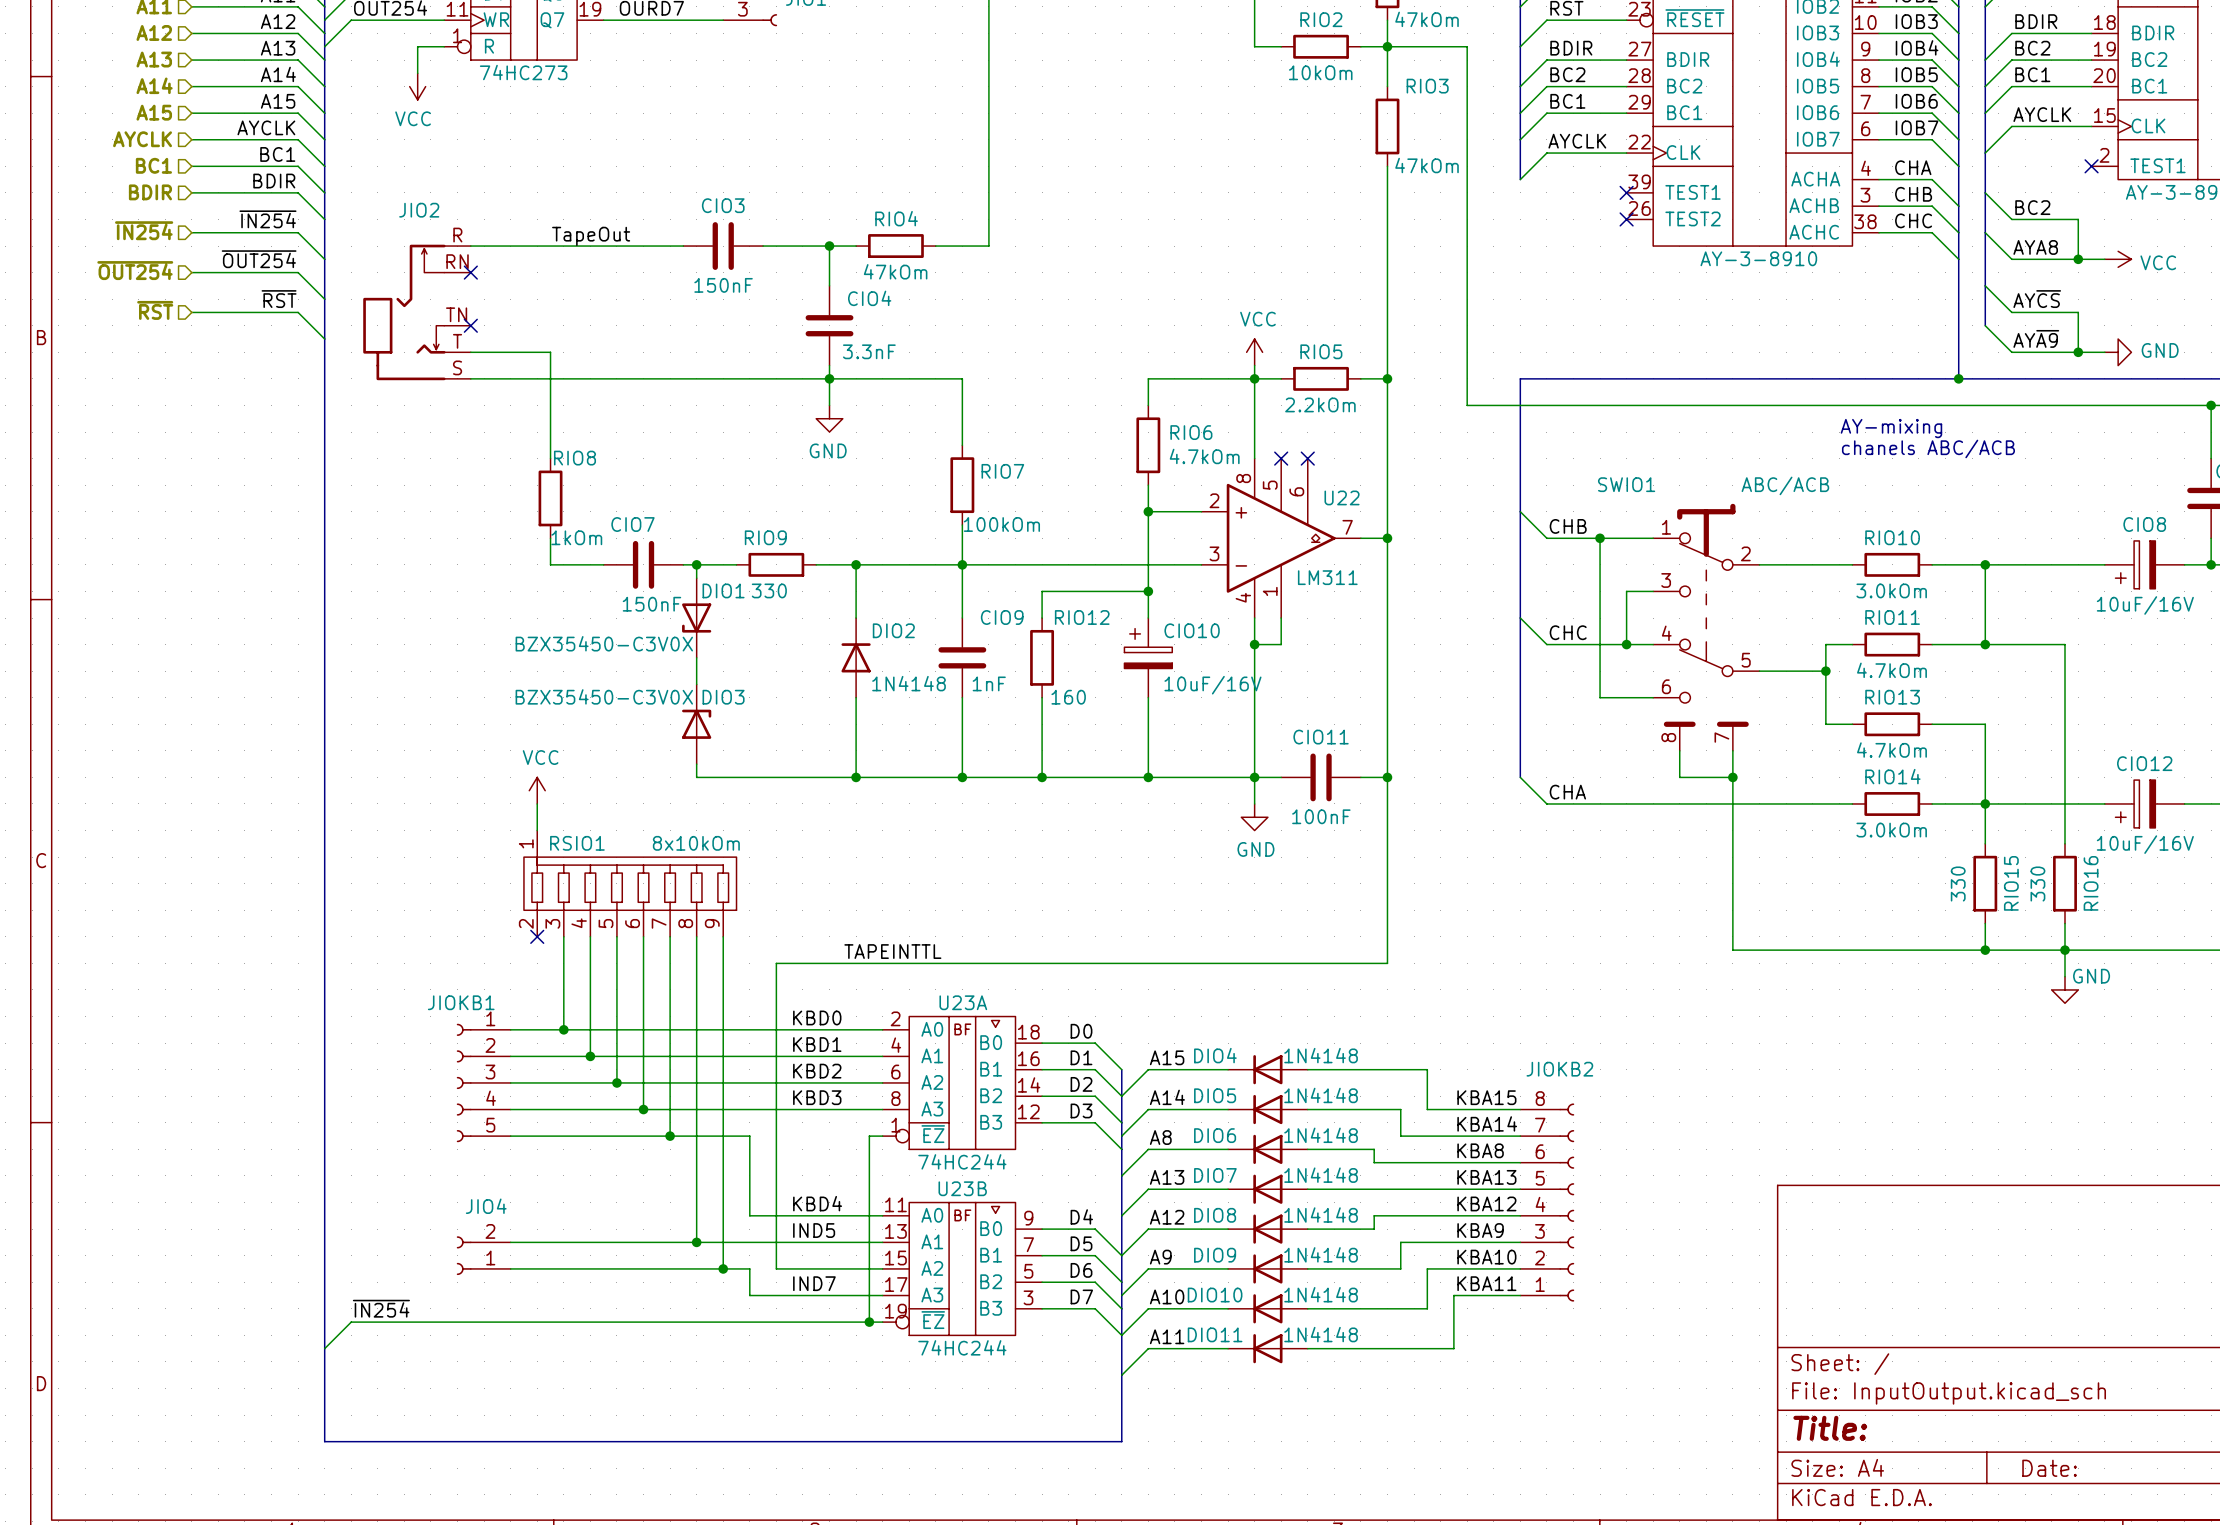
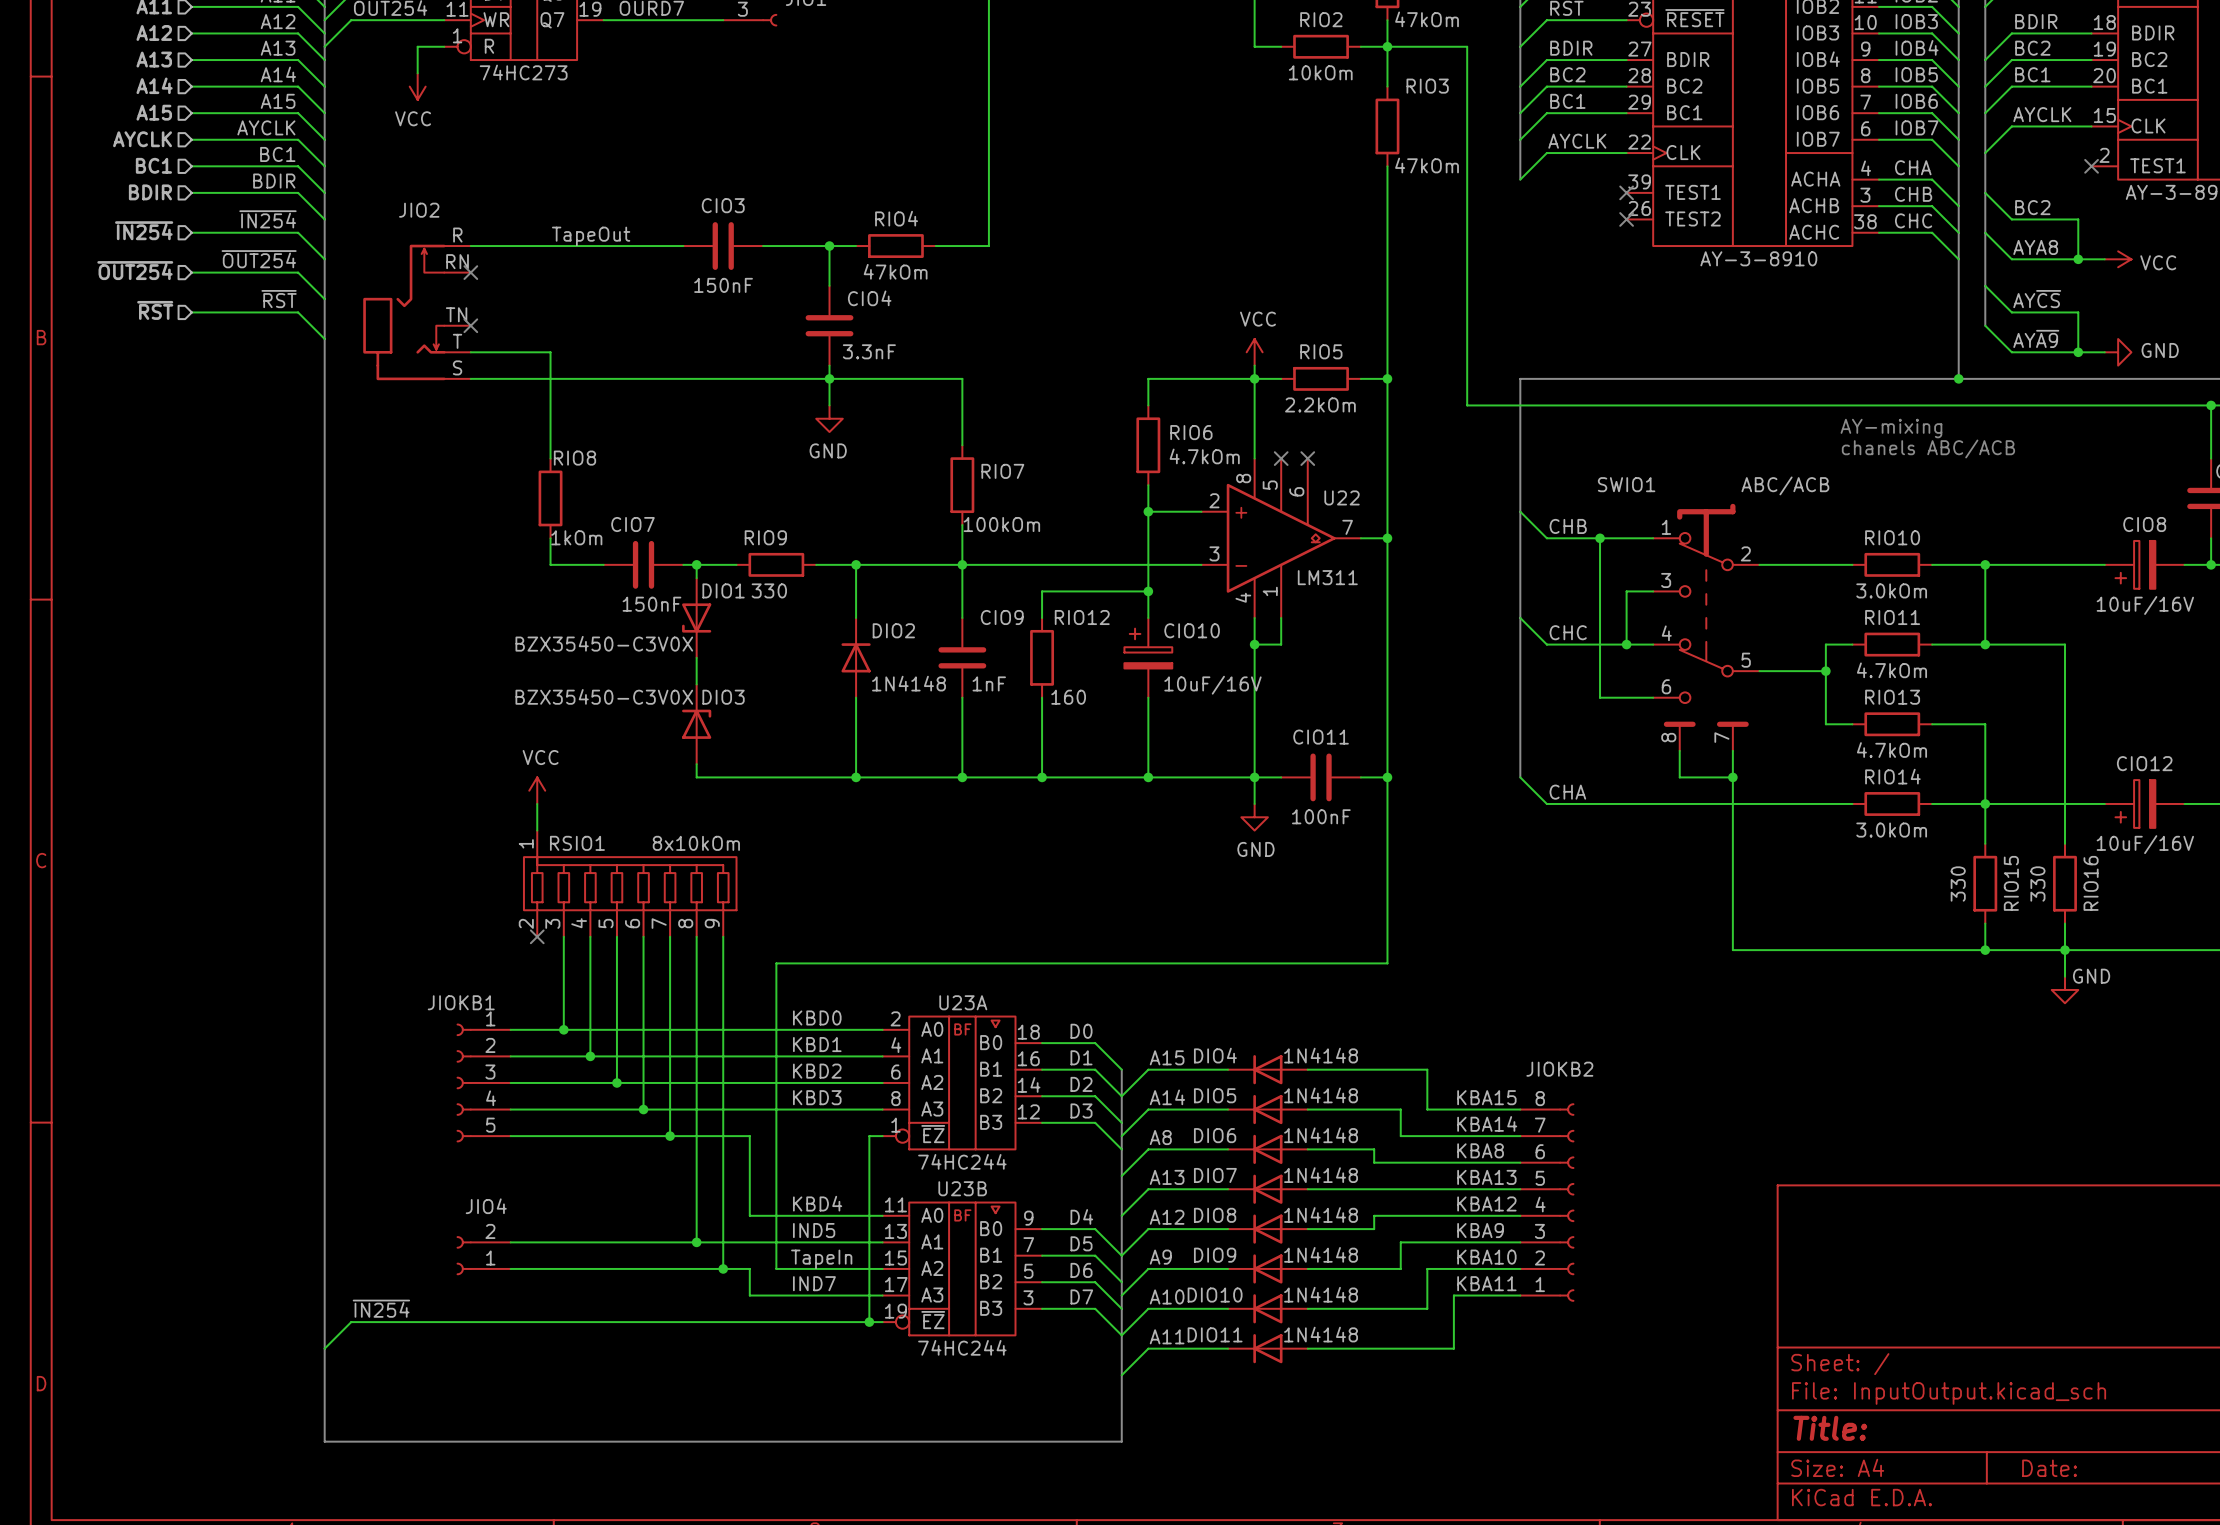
label: TAPEINTTL (892, 951) -> none
label: none -> TapeIn (821, 1259)

